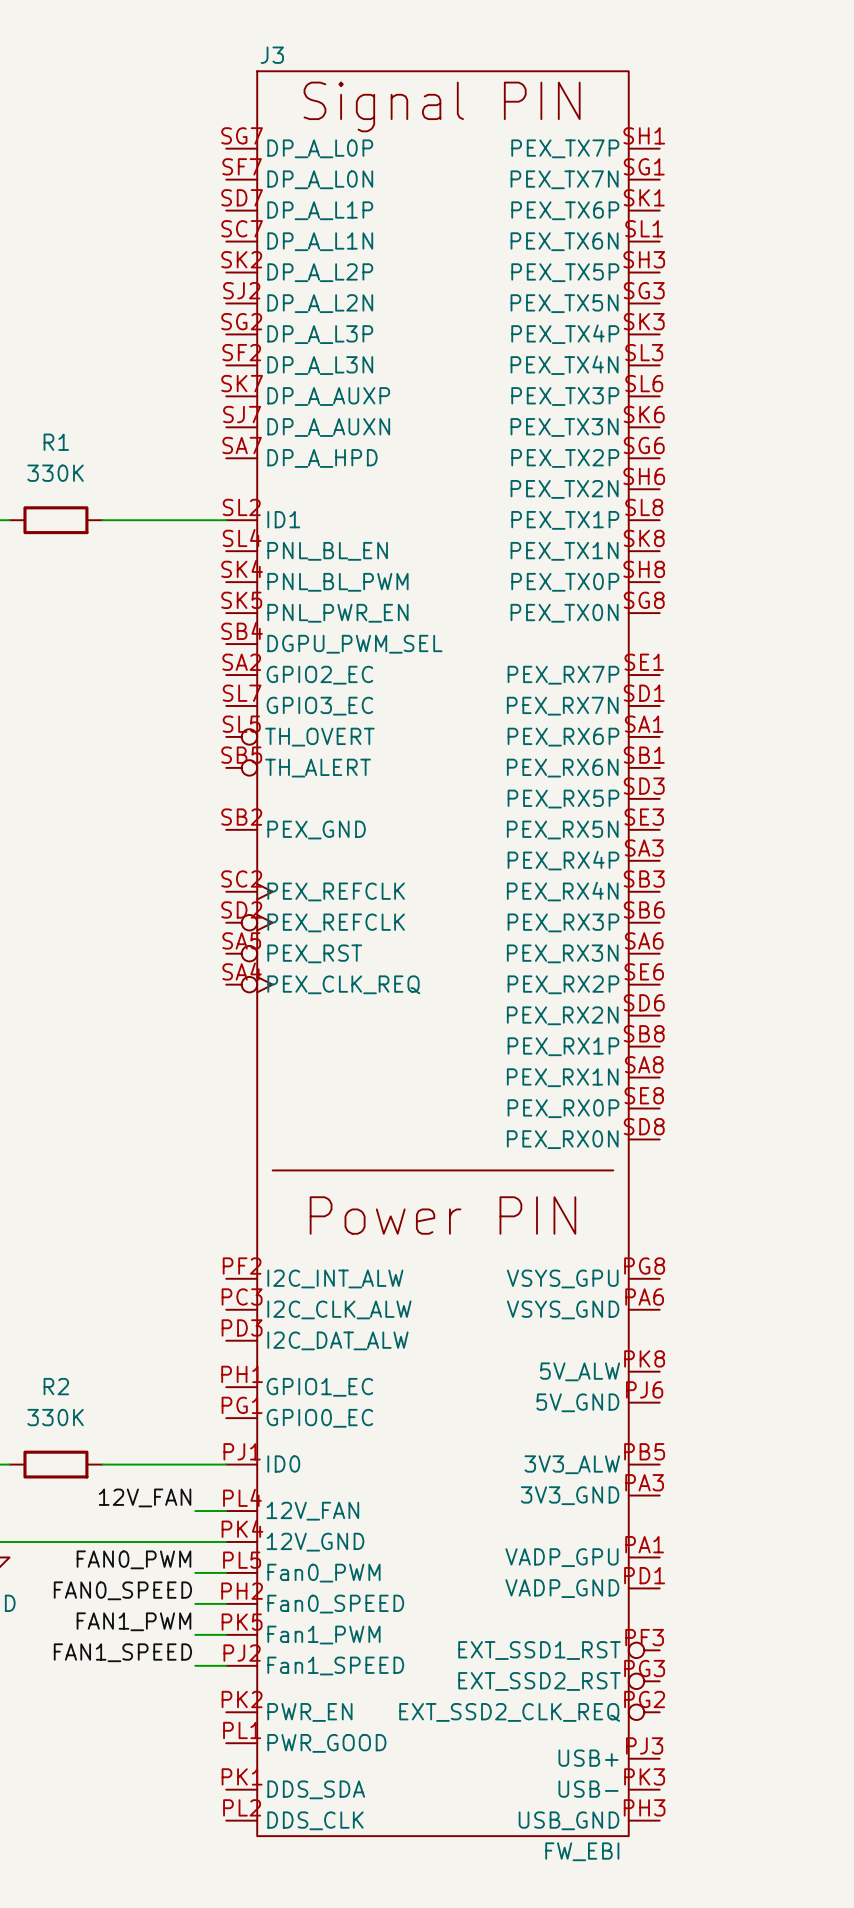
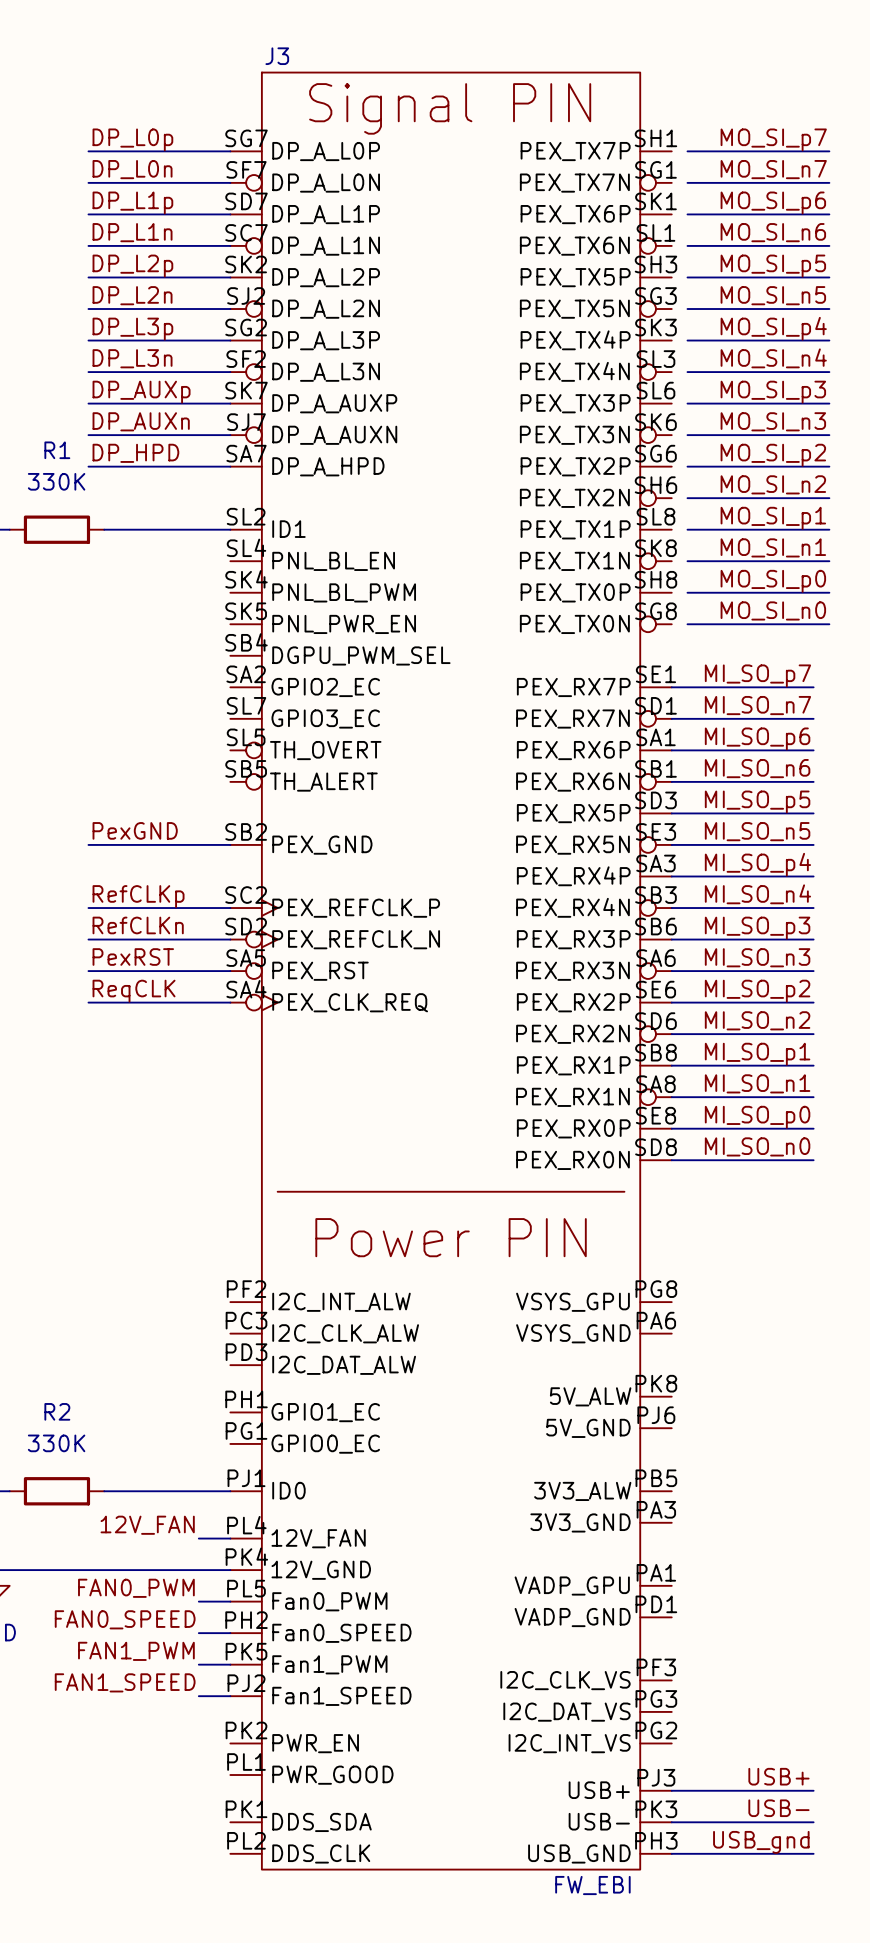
J3 symbol: [226, 71, 660, 1837] -> [230, 72, 672, 1870]
label: none -> DP_L0p (132, 139)
label: none -> MO_SI_p7 (773, 139)
wire: none -> (88, 151) (230, 151)
wire: none -> (687, 151) (829, 151)
label: none -> DP_L0n (132, 169)
label: none -> MO_SI_n7 (773, 169)
wire: none -> (88, 182) (230, 182)
wire: none -> (687, 182) (829, 182)
label: none -> DP_L1p (132, 202)
label: none -> MO_SI_p6 (773, 202)
wire: none -> (88, 214) (230, 214)
wire: none -> (687, 214) (829, 214)
label: none -> DP_L1n (132, 232)
label: none -> MO_SI_n6 (773, 232)
wire: none -> (88, 245) (230, 245)
wire: none -> (687, 245) (829, 245)
label: none -> DP_L2p (132, 266)
label: none -> MO_SI_p5 (773, 266)
wire: none -> (88, 277) (230, 277)
wire: none -> (687, 277) (829, 277)
label: none -> DP_L2n (132, 295)
label: none -> MO_SI_n5 (773, 295)
wire: none -> (88, 309) (230, 309)
wire: none -> (687, 309) (829, 309)
label: none -> MO_SI_p4 (773, 328)
label: none -> DP_L3p (132, 329)
wire: none -> (88, 340) (230, 340)
wire: none -> (687, 340) (829, 340)
label: none -> MO_SI_n4 (773, 358)
label: none -> DP_L3n (132, 358)
wire: none -> (88, 372) (230, 372)
wire: none -> (687, 372) (829, 372)
label: none -> DP_AUXp (141, 392)
label: none -> MO_SI_p3 (773, 392)
wire: none -> (88, 403) (230, 403)
wire: none -> (687, 403) (829, 403)
label: none -> DP_AUXn (141, 421)
label: none -> MO_SI_n3 (773, 421)
wire: none -> (88, 435) (230, 435)
wire: none -> (687, 435) (829, 435)
label: none -> DP_HPD (135, 453)
label: none -> MO_SI_p2 (773, 455)
wire: none -> (88, 466) (230, 466)
wire: none -> (687, 466) (829, 466)
label: none -> MO_SI_n2 (773, 484)
wire: none -> (687, 498) (829, 498)
label: none -> MO_SI_p1 (773, 518)
wire: none -> (687, 529) (829, 529)
label: none -> MO_SI_n1 (773, 547)
wire: none -> (687, 561) (829, 561)
label: none -> MO_SI_p0 (773, 581)
wire: none -> (687, 592) (829, 592)
label: none -> MO_SI_n0 (773, 610)
wire: none -> (687, 624) (829, 624)
label: none -> MI_SO_p7 (757, 675)
wire: none -> (671, 687) (813, 687)
label: none -> MI_SO_n7 (757, 705)
wire: none -> (671, 718) (813, 718)
label: none -> MI_SO_p6 (757, 738)
wire: none -> (671, 750) (813, 750)
label: none -> MI_SO_n6 (757, 768)
wire: none -> (671, 781) (813, 781)
label: none -> MI_SO_p5 (757, 801)
wire: none -> (671, 813) (813, 813)
label: none -> PexGND (135, 830)
label: none -> MI_SO_n5 (757, 831)
wire: none -> (88, 844) (230, 844)
wire: none -> (671, 844) (813, 844)
label: none -> MI_SO_p4 (757, 864)
wire: none -> (671, 876) (813, 876)
label: none -> MI_SO_n4 (757, 894)
label: none -> RefCLKp (138, 896)
wire: none -> (88, 908) (230, 908)
wire: none -> (671, 908) (813, 908)
label: none -> RefCLKn (138, 925)
label: none -> MI_SO_p3 (757, 928)
wire: none -> (88, 939) (230, 939)
wire: none -> (671, 939) (813, 939)
label: none -> PexRST (133, 957)
label: none -> MI_SO_n3 (757, 957)
wire: none -> (88, 971) (230, 971)
wire: none -> (671, 971) (813, 971)
label: none -> ReqCLK (134, 991)
label: none -> MI_SO_p2 (757, 991)
wire: none -> (88, 1002) (230, 1002)
wire: none -> (671, 1002) (813, 1002)
label: none -> MI_SO_n2 (757, 1020)
wire: none -> (671, 1034) (813, 1034)
label: none -> MI_SO_p1 (757, 1054)
wire: none -> (671, 1065) (813, 1065)
label: none -> MI_SO_n1 (757, 1083)
wire: none -> (671, 1097) (813, 1097)
label: none -> MI_SO_p0 (757, 1117)
wire: none -> (671, 1128) (813, 1128)
label: none -> MI_SO_n0 (757, 1146)
wire: none -> (671, 1160) (813, 1160)
label: none -> USB+ (778, 1776)
wire: none -> (671, 1790) (813, 1790)
label: none -> USB- (778, 1808)
wire: none -> (671, 1822) (813, 1822)
label: none -> USB_gnd (761, 1842)
wire: none -> (671, 1853) (813, 1853)

